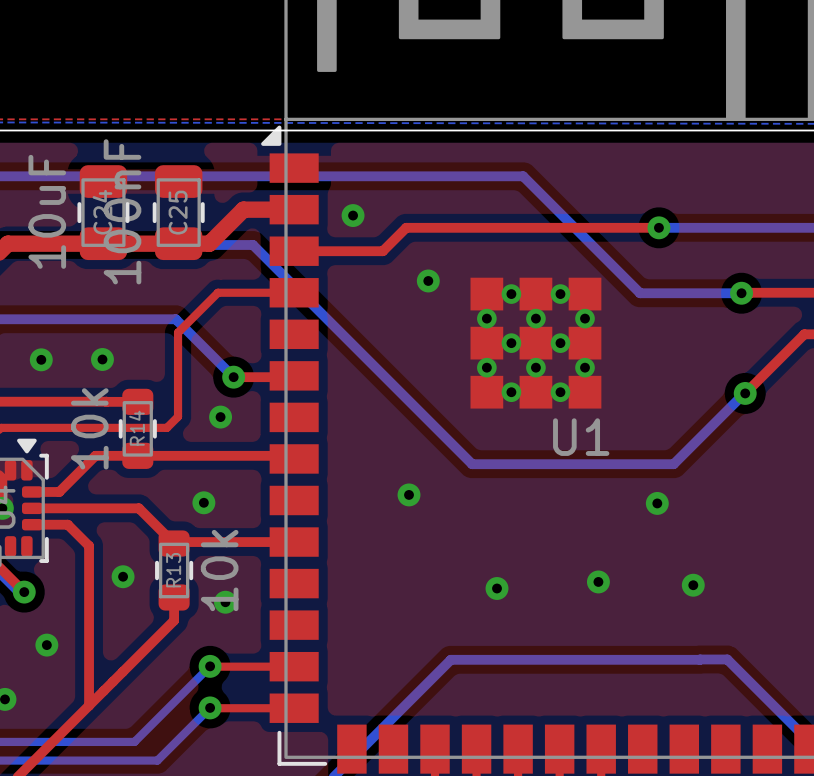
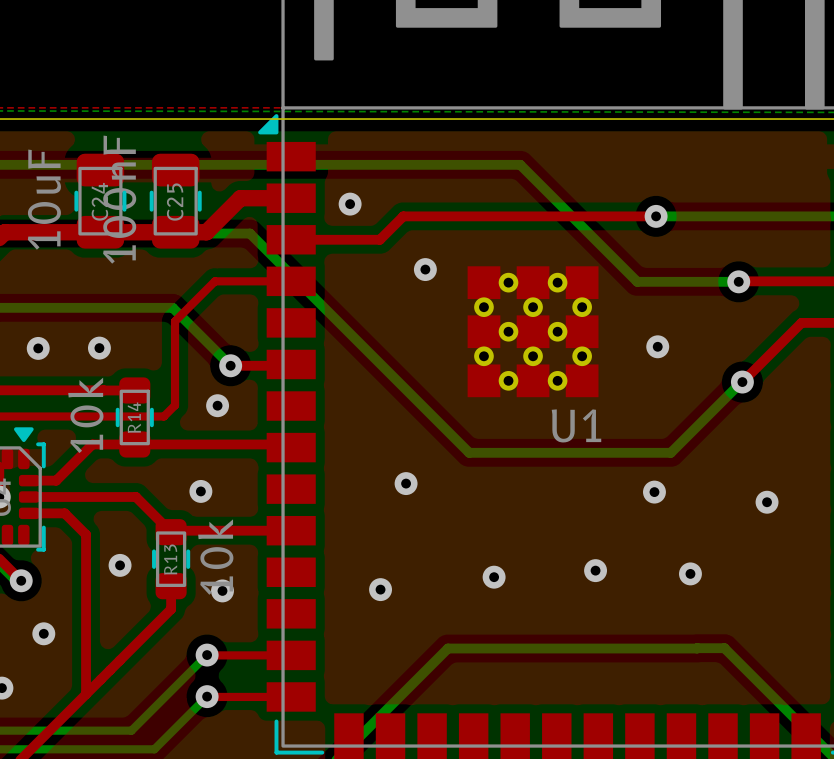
via: none -> (657, 346)
via: none -> (767, 502)
via: none -> (380, 589)

